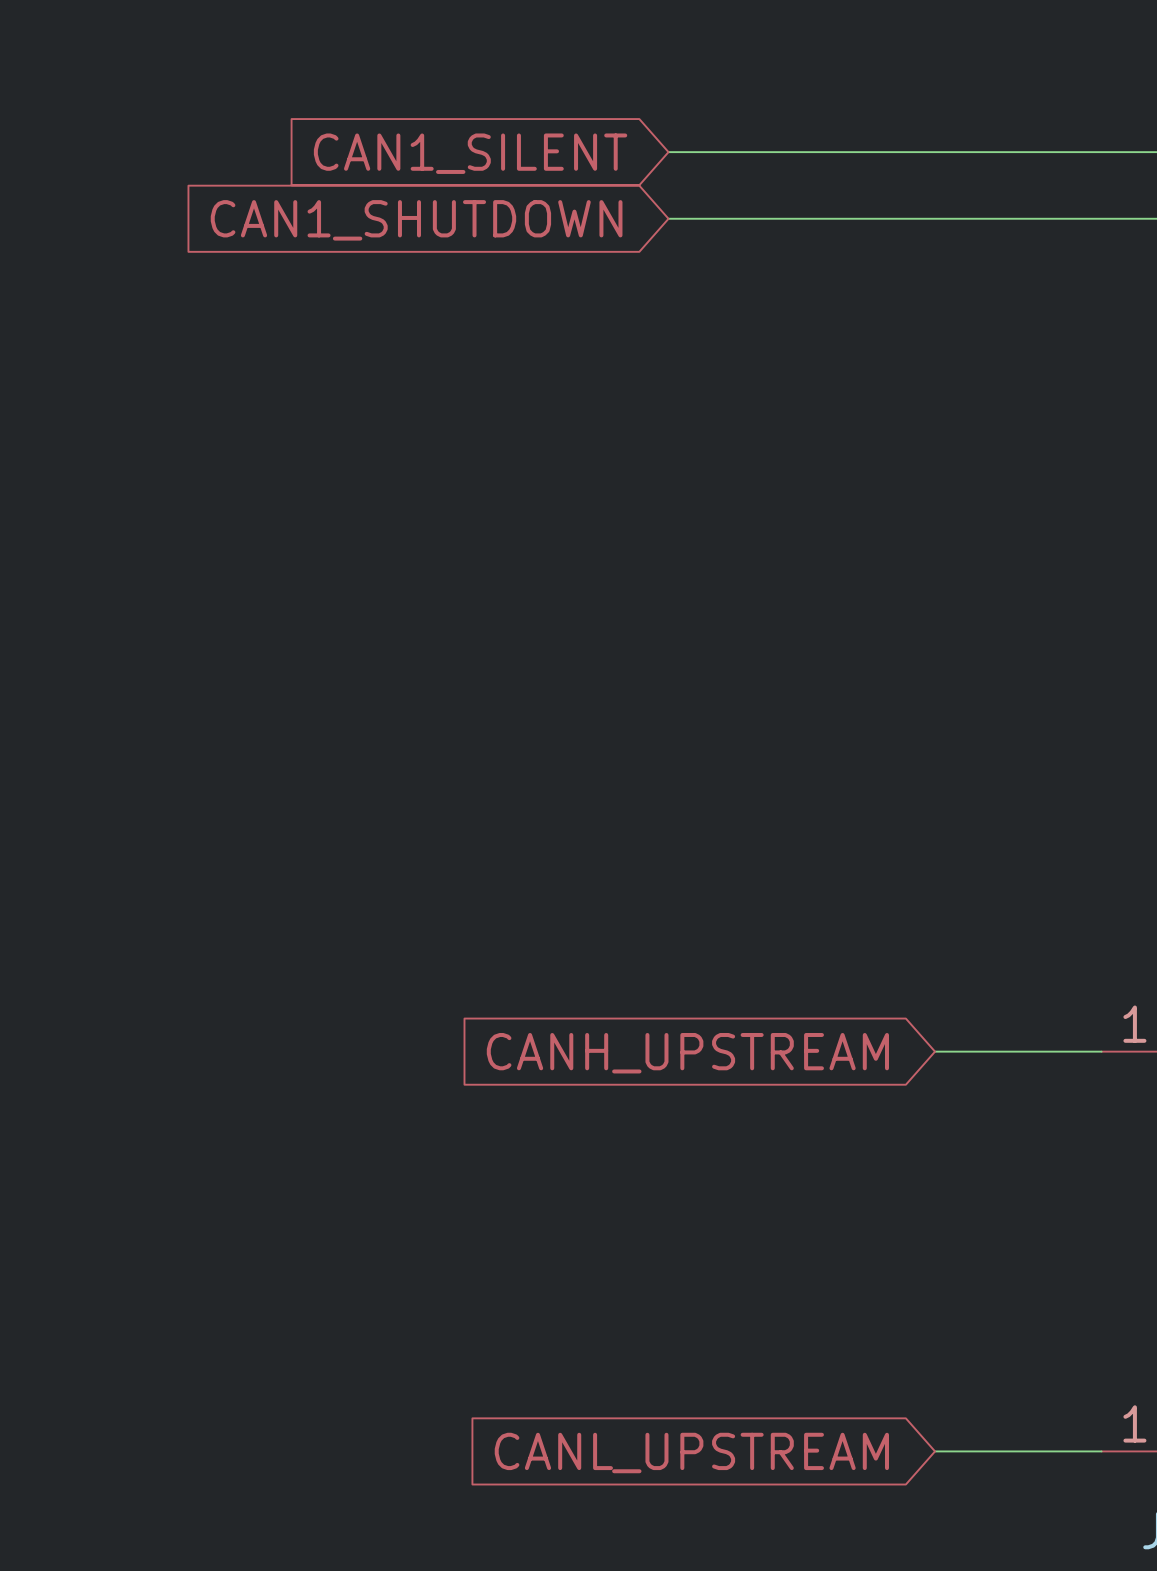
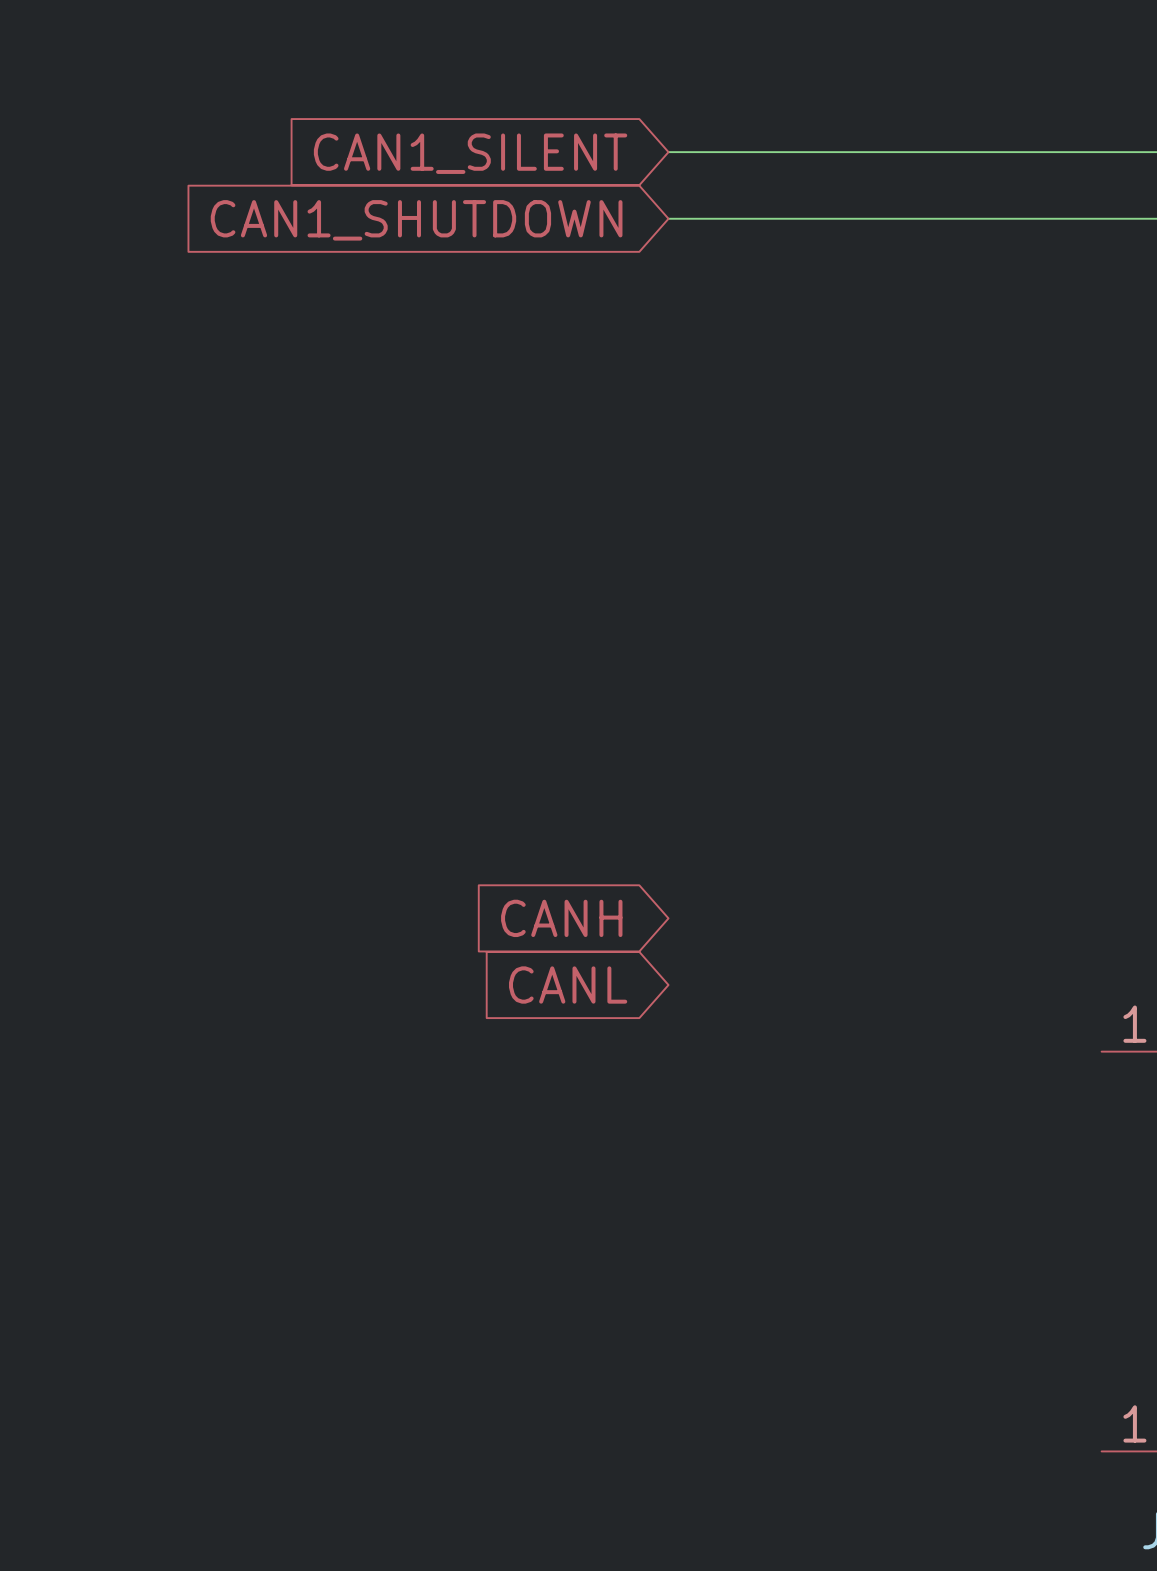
global label: none -> CANH (561, 918)
global label: none -> CANL (568, 985)
wire: (935, 1051) (1101, 1051) -> none
global label: CANH_UPSTREAM (687, 1053) -> none
wire: (935, 1451) (1101, 1451) -> none
global label: CANL_UPSTREAM (691, 1453) -> none

